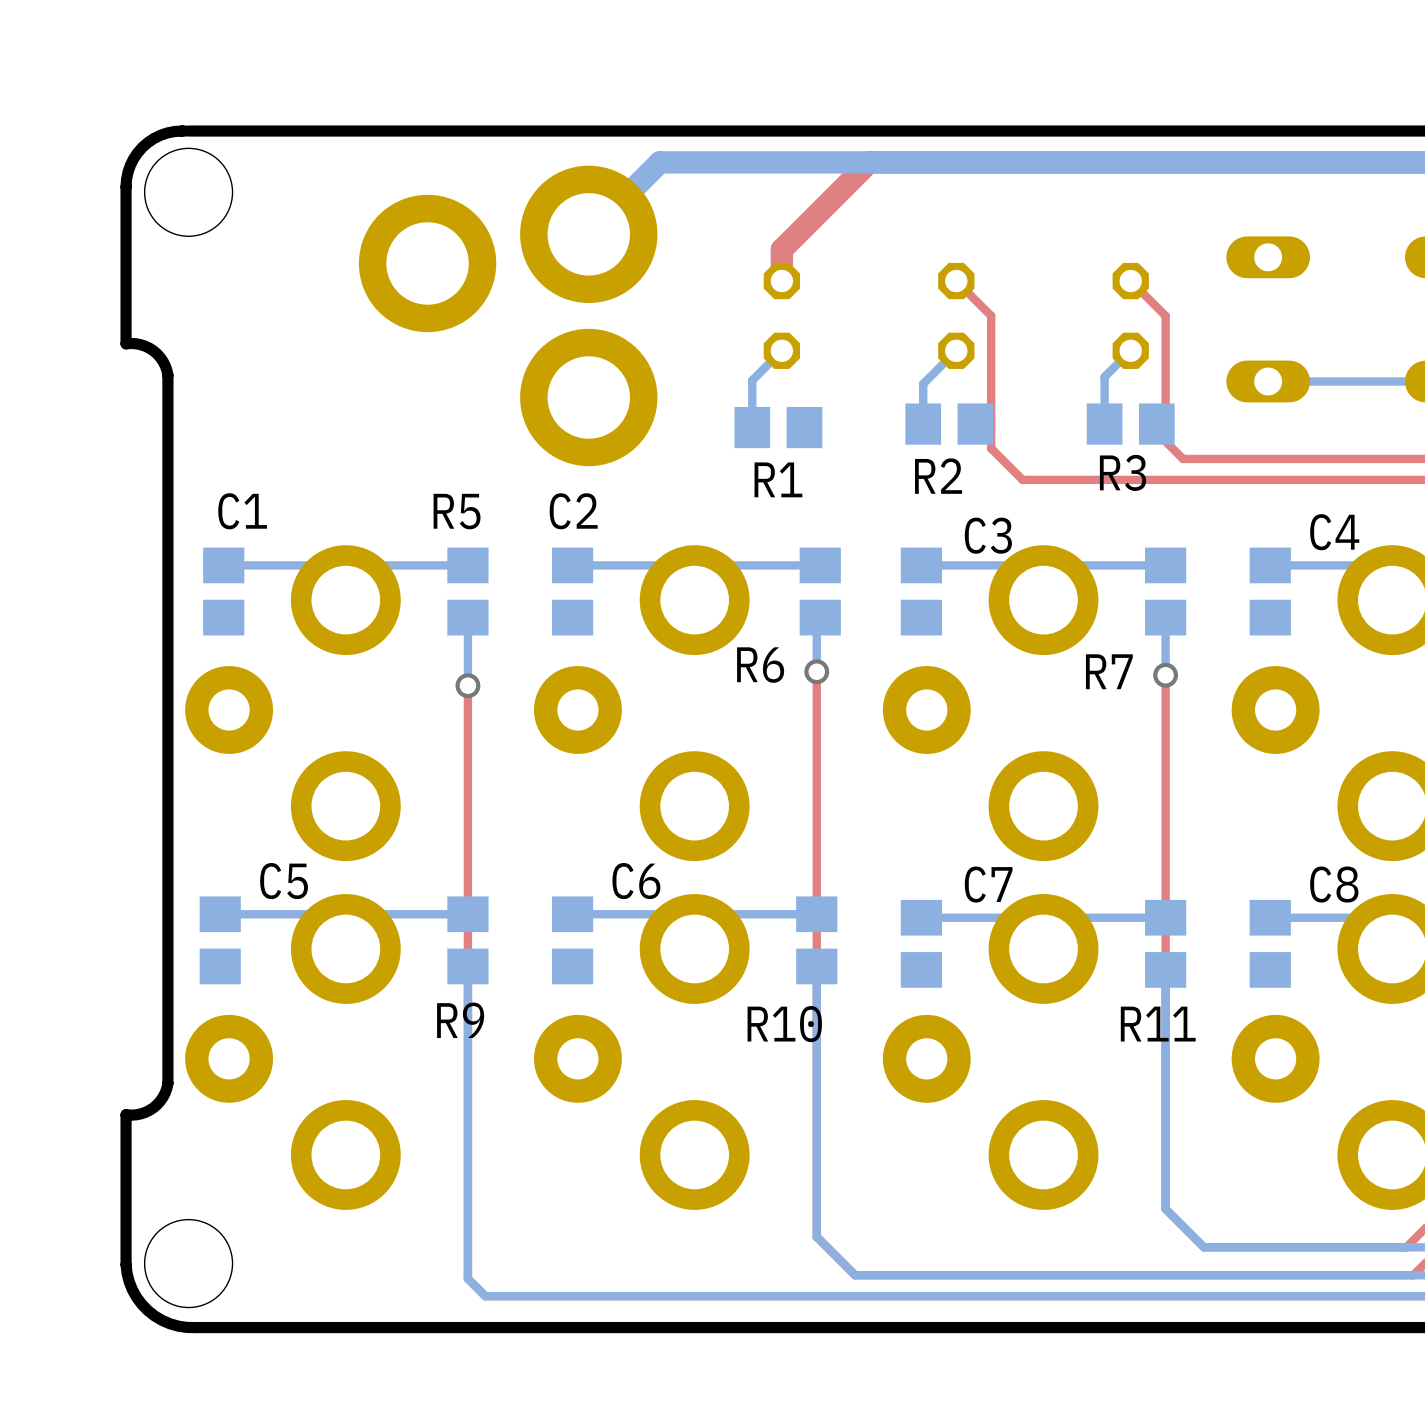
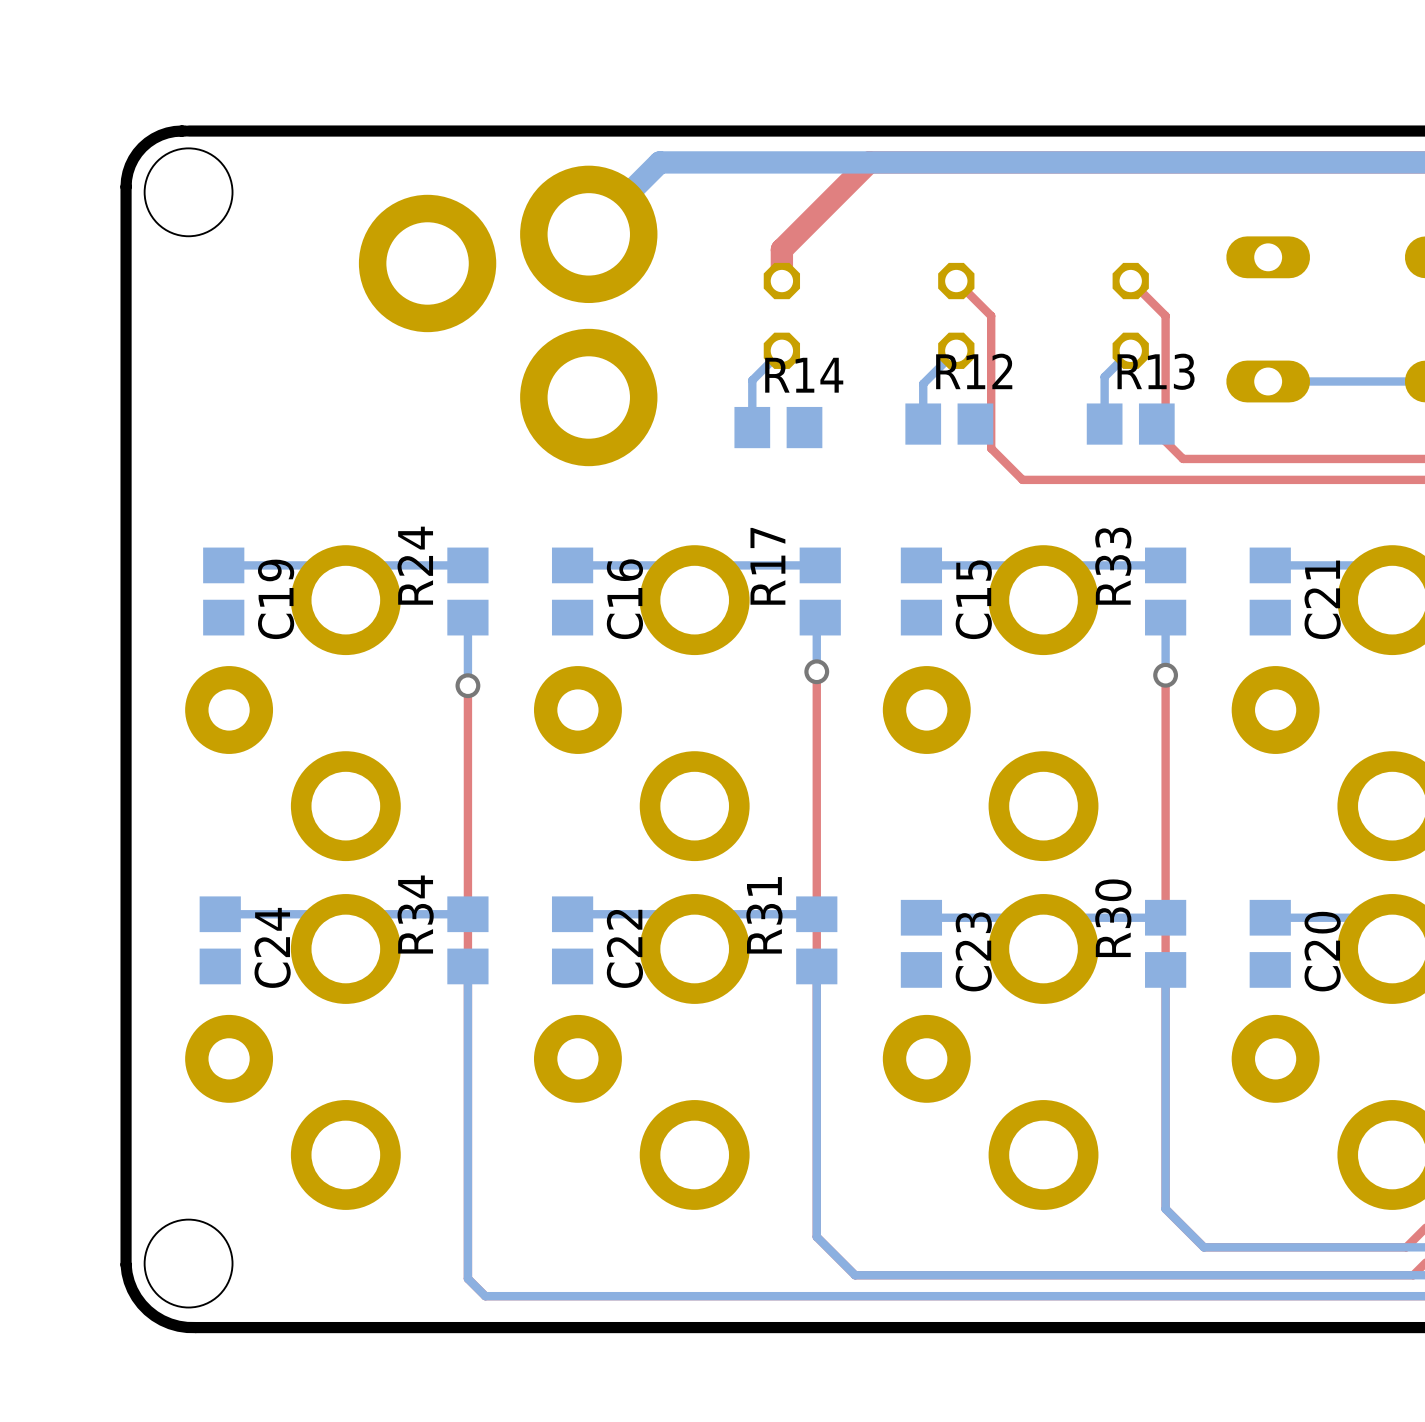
board edge: (126, 343) (140, 344) (153, 350) (163, 361) (167, 375) (167, 1083) (163, 1097) (153, 1107) (140, 1113) (126, 1114) -> (126, 343) (126, 1114)
R3 name: R3 (1123, 472) -> R13 (1156, 371)
R2 name: R2 (938, 476) -> R12 (974, 371)
R1 name: R1 (778, 479) -> R14 (804, 375)
C1 name: C1 (242, 511) -> C19 (276, 599)
R5 name: R5 (457, 511) -> R24 (415, 565)
C2 name: C2 (573, 511) -> C16 (624, 599)
C4 name: C4 (1334, 532) -> C21 (1322, 599)
C3 name: C3 (988, 535) -> C15 (973, 599)
R6 name: R6 (760, 665) -> R17 (767, 566)
R7 name: R7 (1109, 671) -> R33 (1113, 566)
C5 name: C5 (284, 881) -> C24 (272, 947)
C6 name: C6 (636, 881) -> C22 (624, 948)
C7 name: C7 (988, 884) -> C23 (973, 951)
C8 name: C8 (1334, 884) -> C20 (1322, 951)
R9 name: R9 (460, 1020) -> R34 (415, 914)
R10 name: R10 (784, 1024) -> R31 (764, 915)
R11 name: R11 (1158, 1024) -> R30 (1113, 918)

